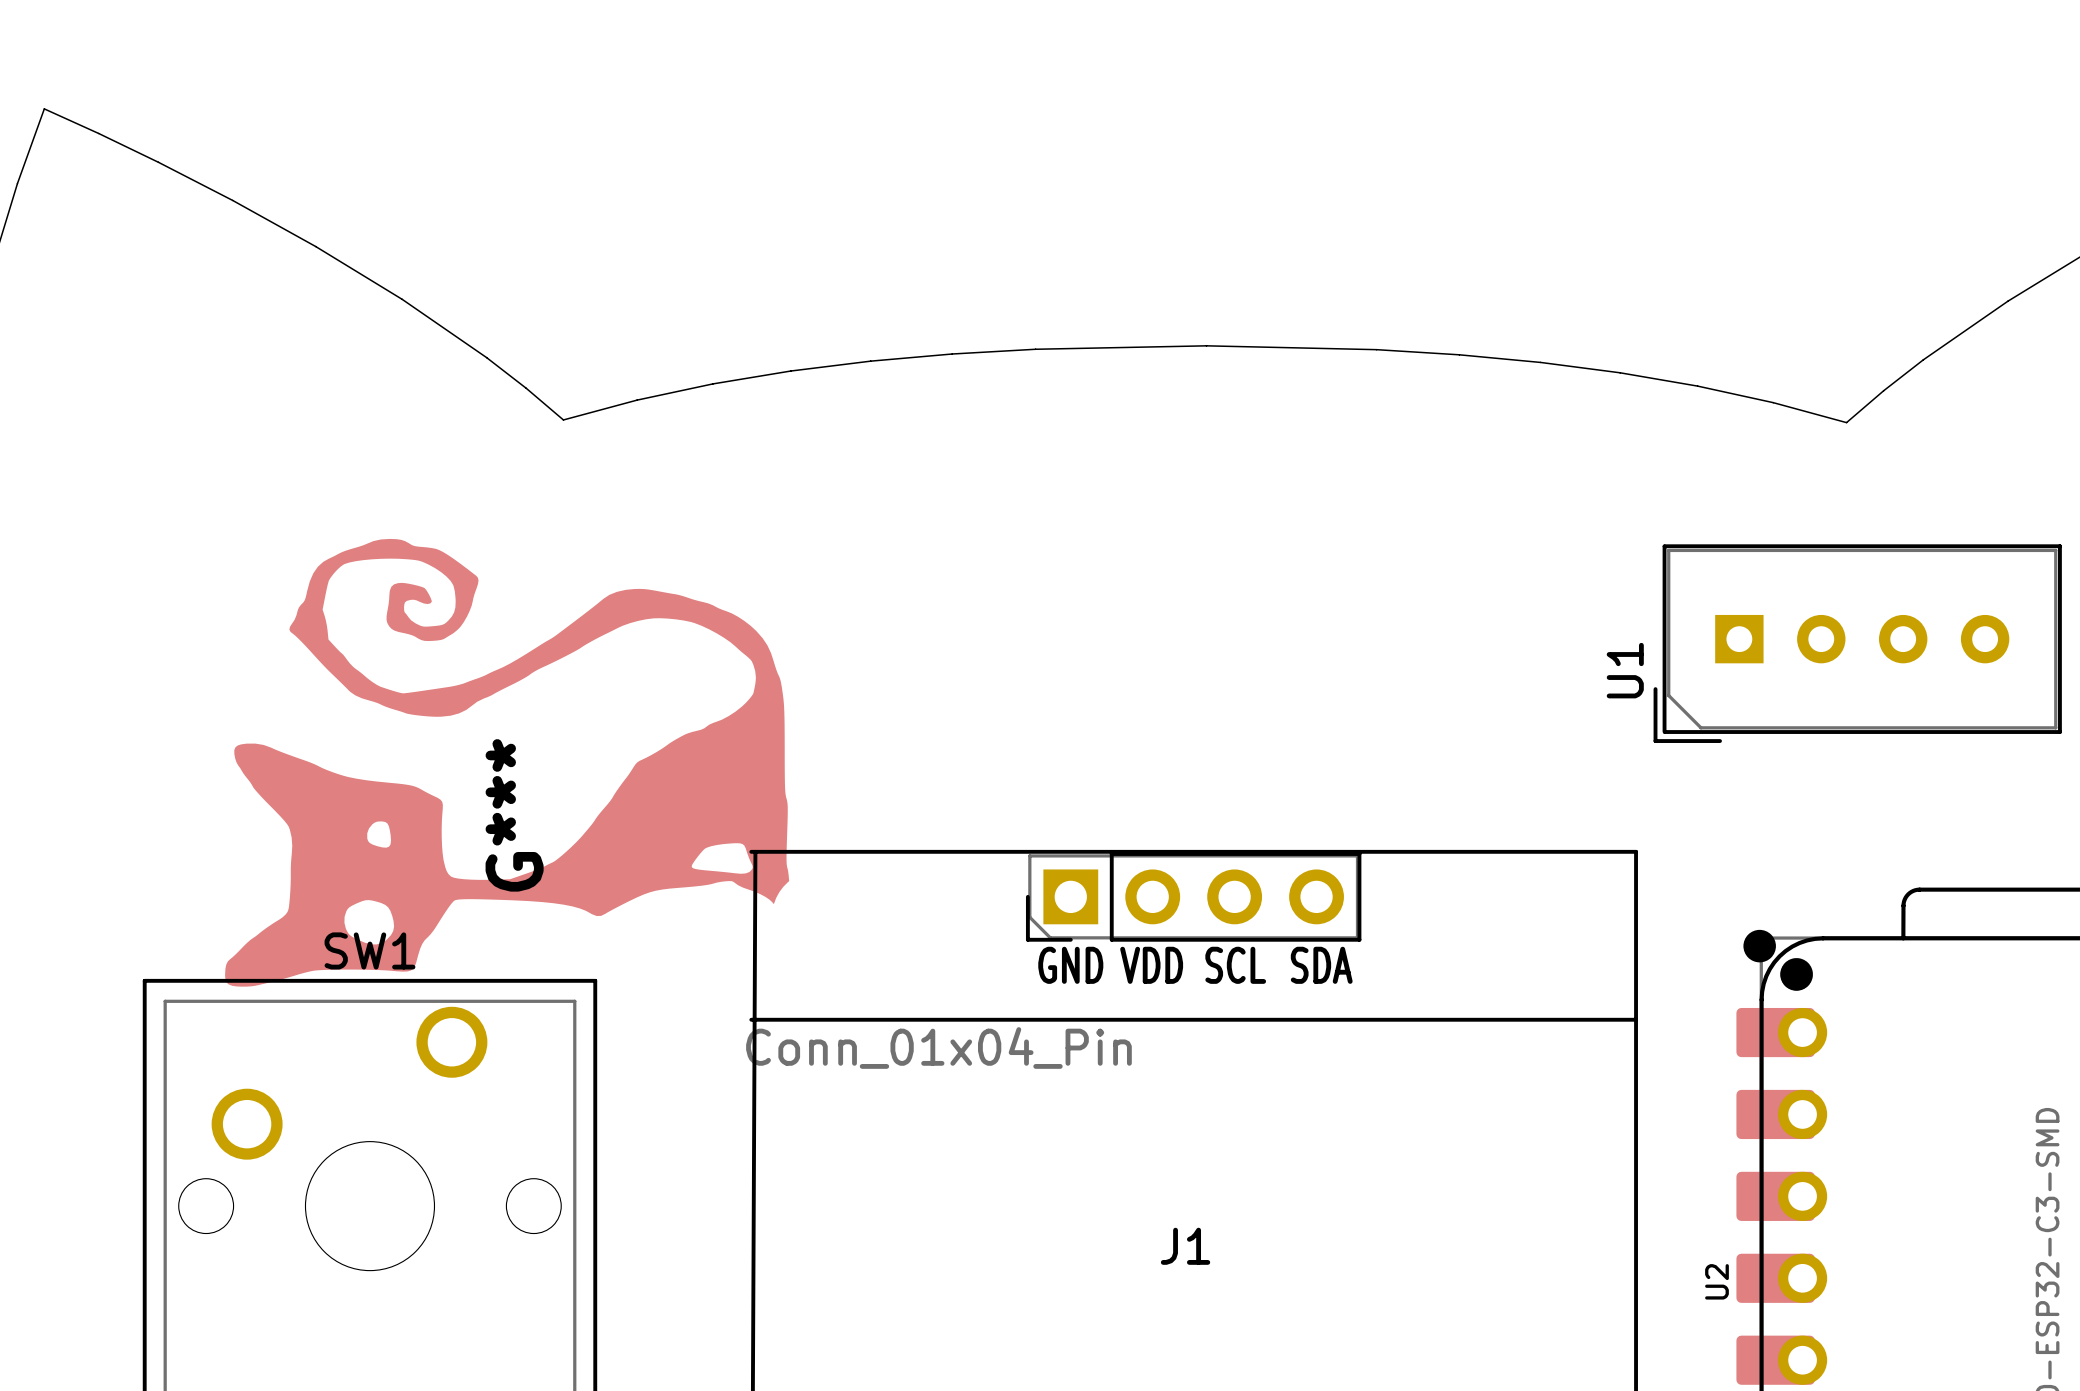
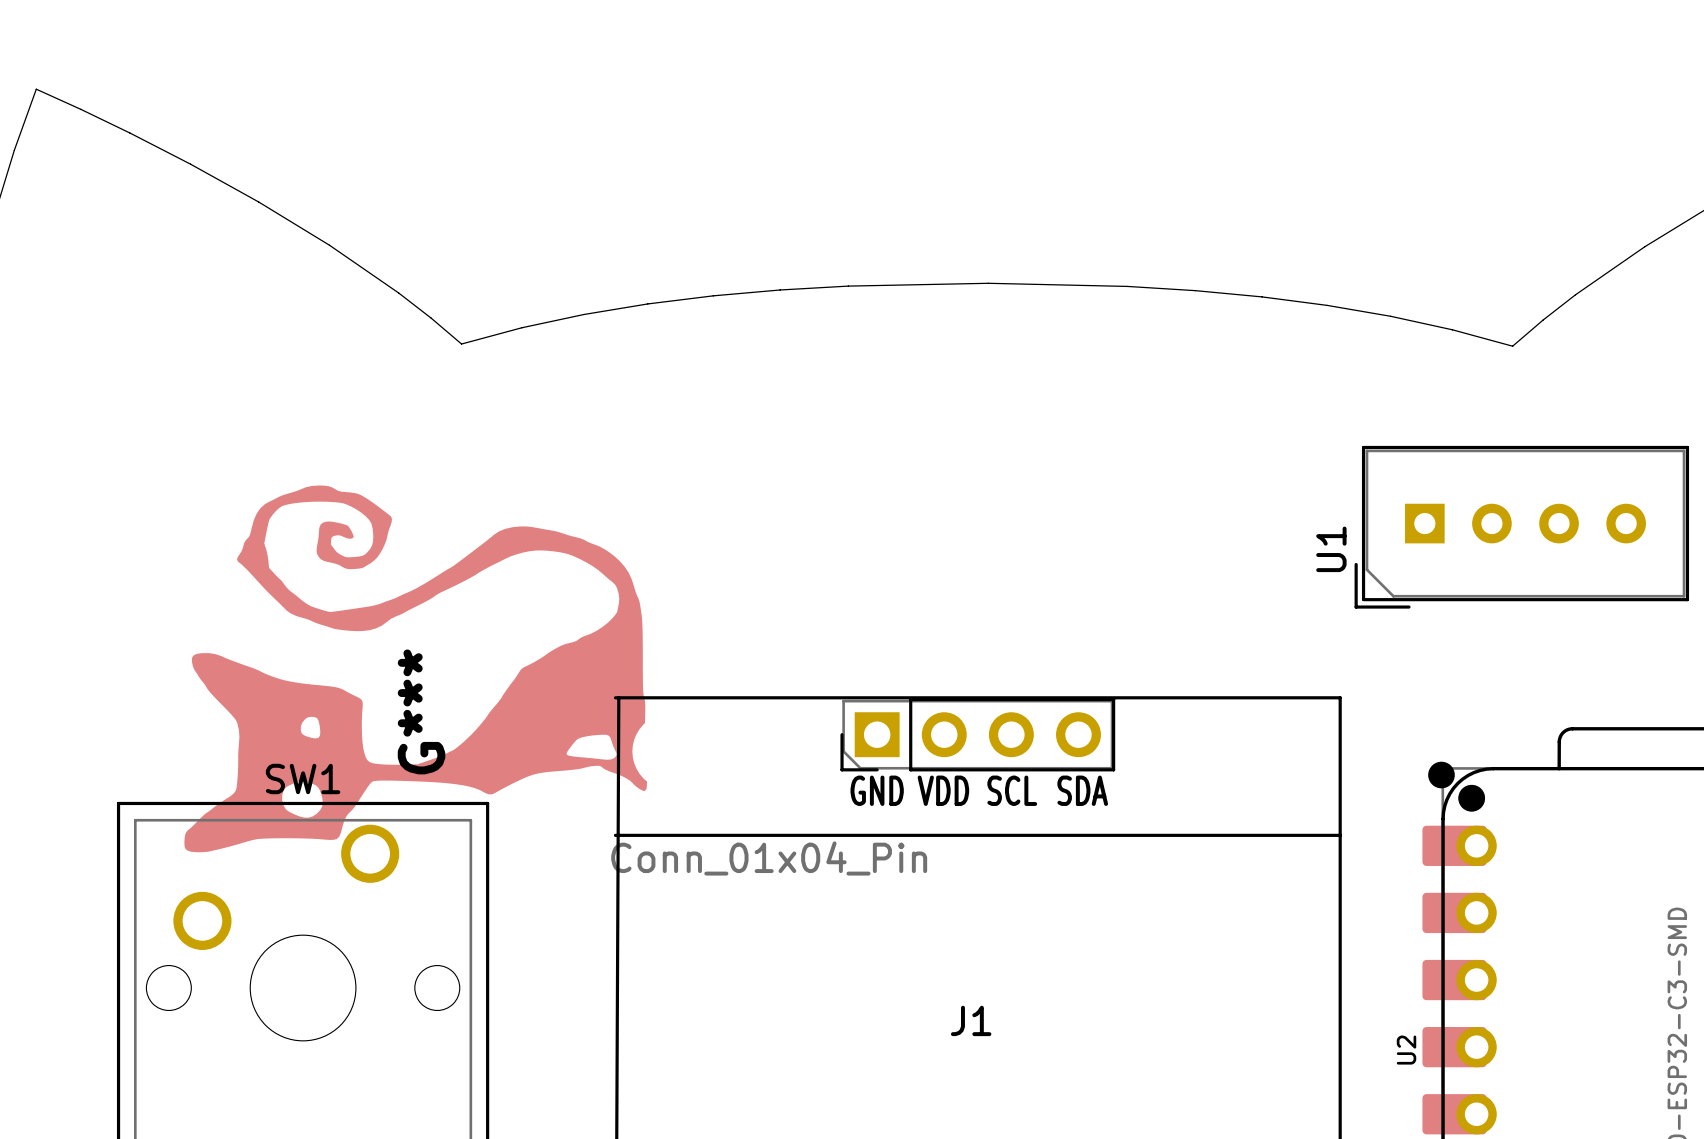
G*** position: (507, 762) -> (415, 668)

